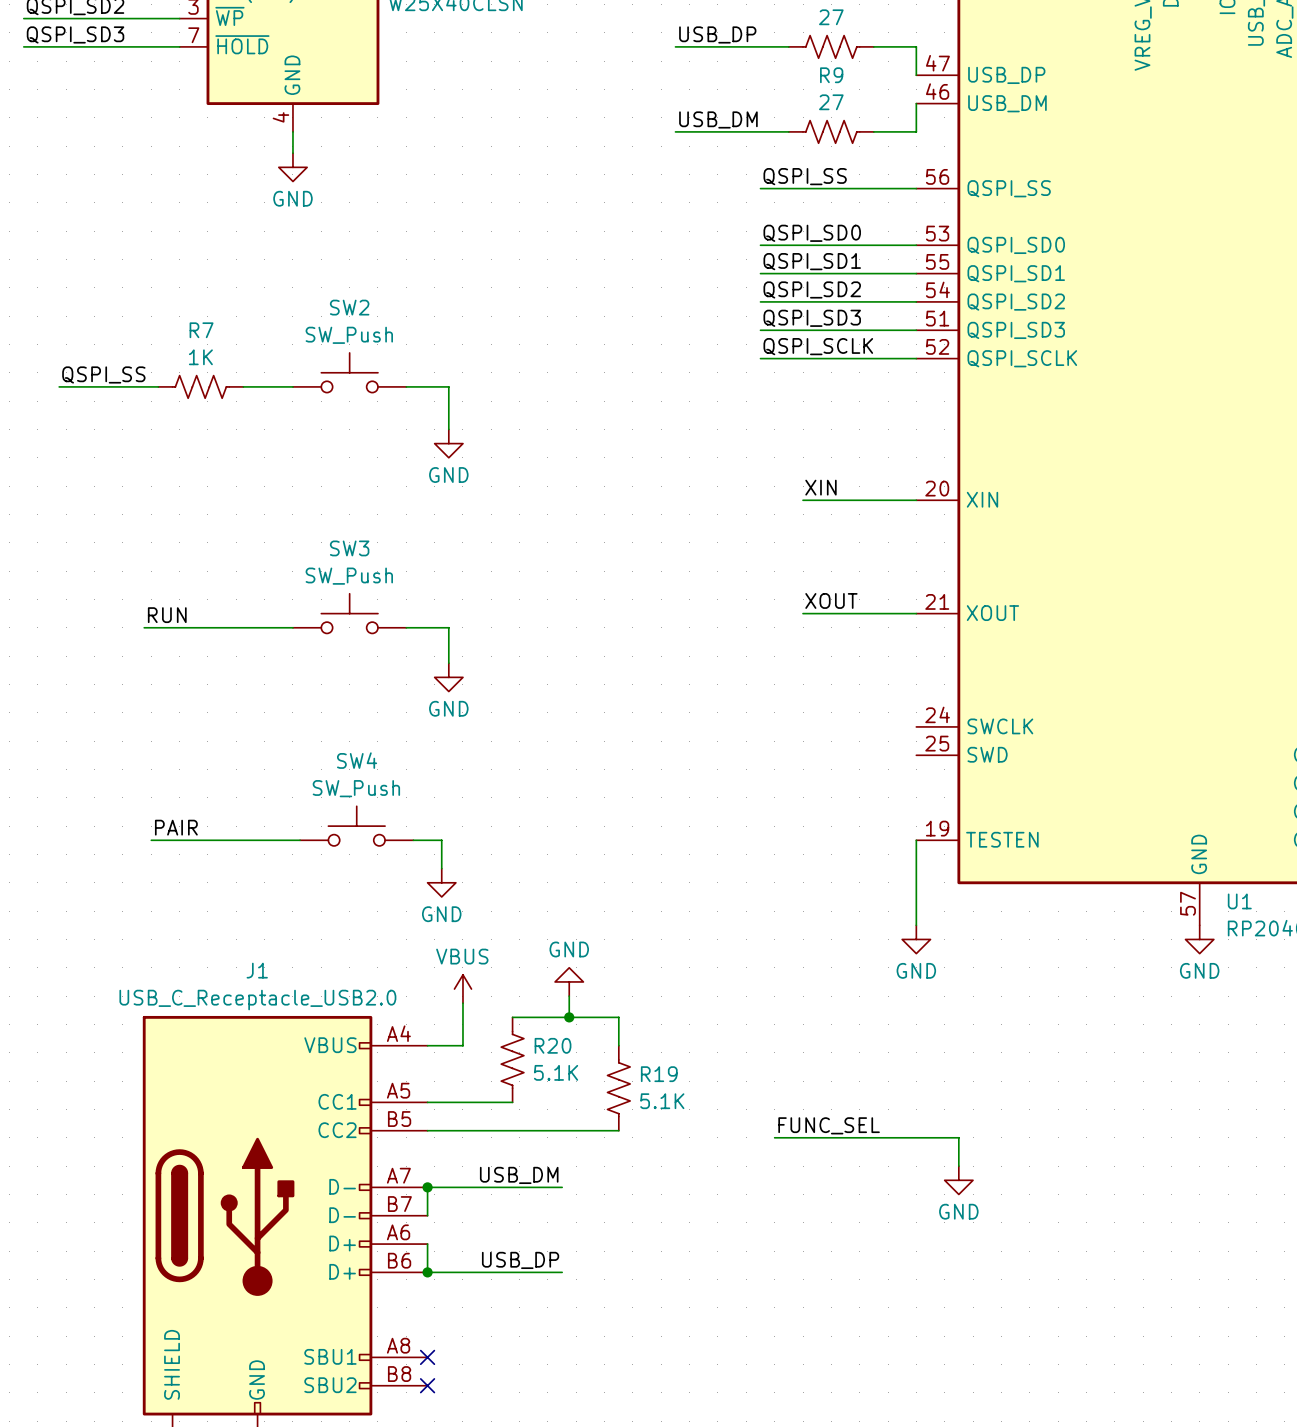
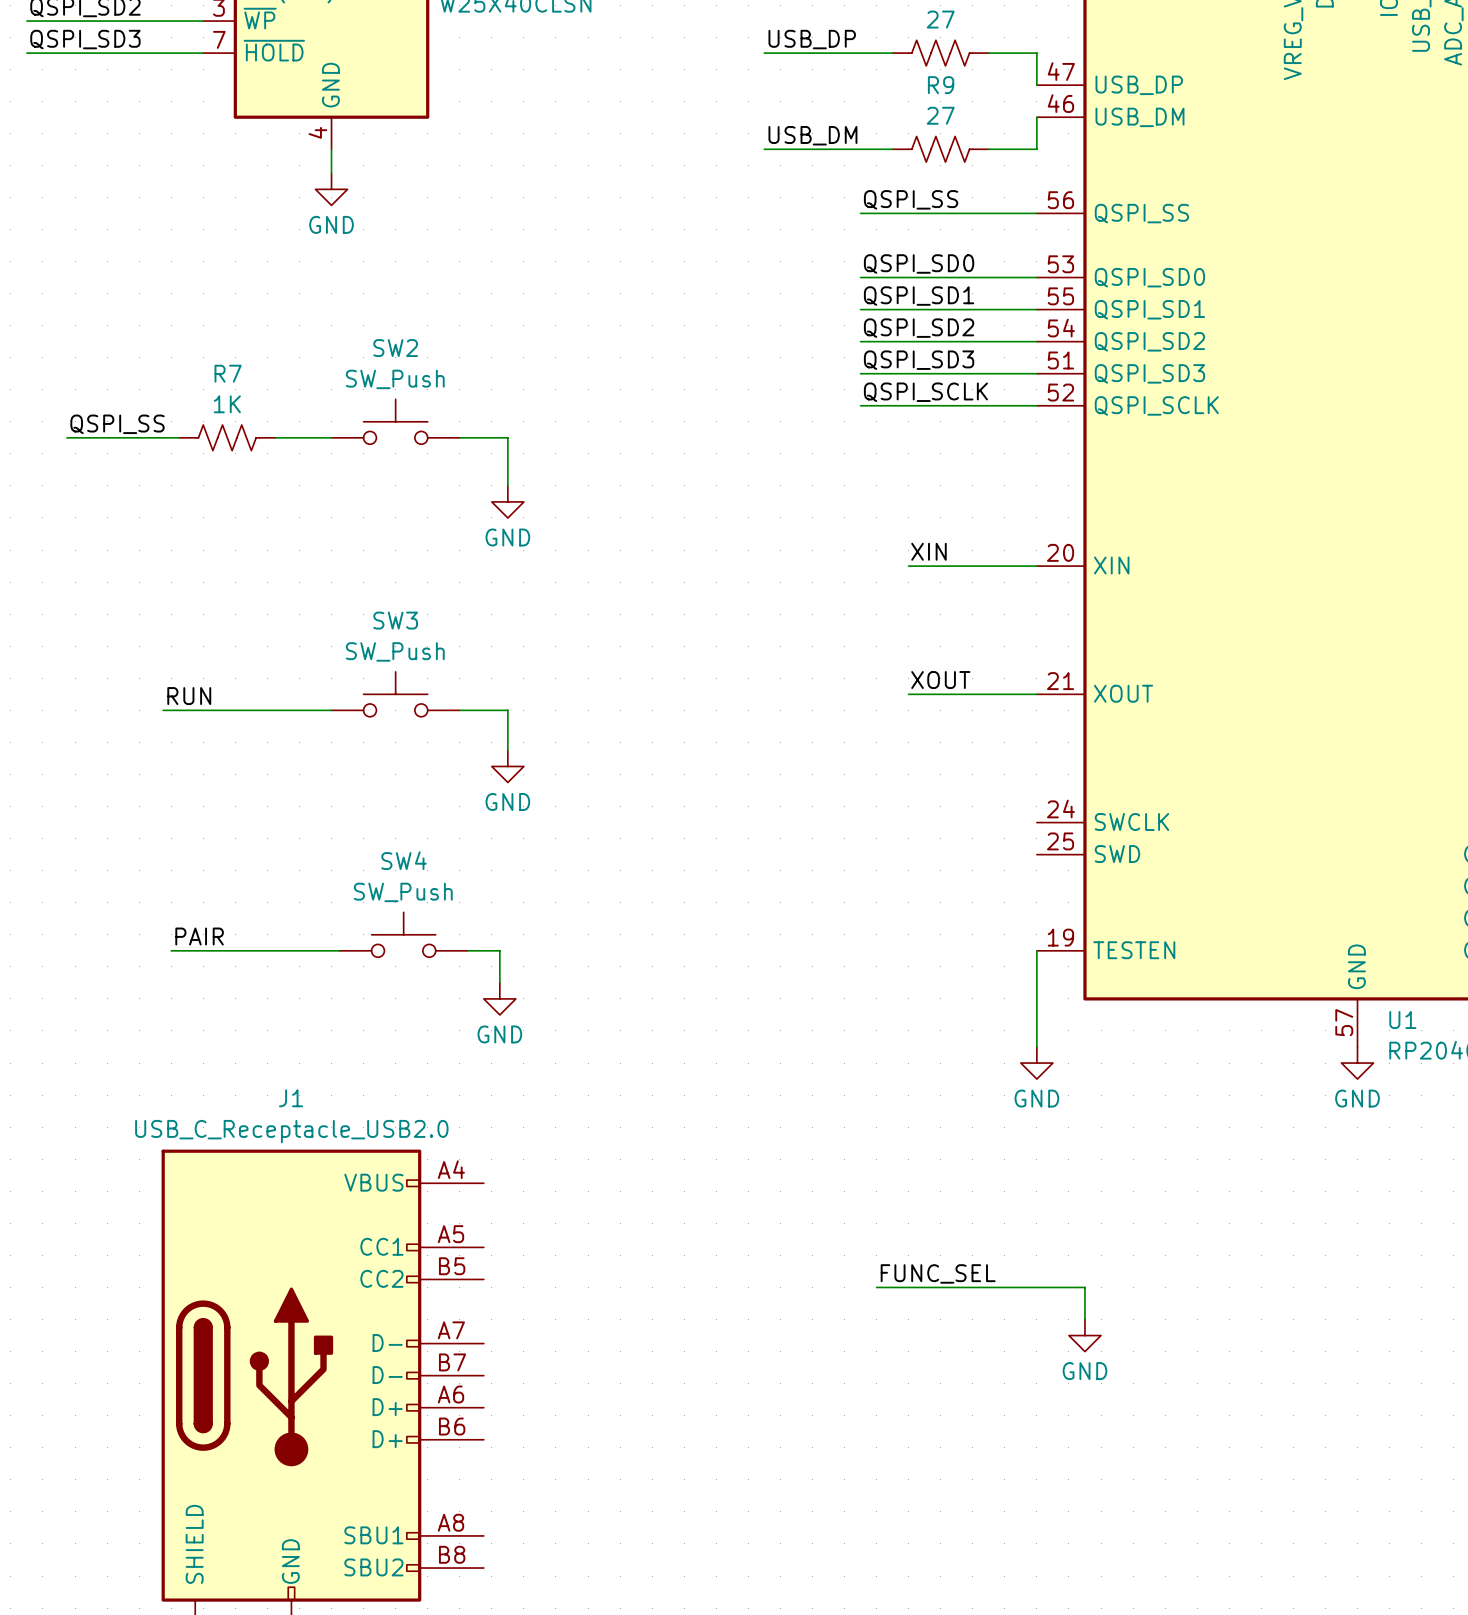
power symbol: GND (569, 981) -> none
power symbol: VBUS (462, 989) -> none
wire: (569, 996) (569, 1017) -> none
wire: (462, 1003) (462, 1045) (427, 1045) -> none
wire: (512, 1017) (618, 1017) (618, 1045) -> none
junction: (569, 1017) -> none
R20: 5.1K (512, 1059) -> none
R19: 5.1K (618, 1088) -> none
wire: (427, 1102) (512, 1102) -> none
wire: (427, 1130) (618, 1130) -> none
label: USB_DM (519, 1175) -> none
junction: (427, 1187) -> none
wire: (562, 1187) (427, 1187) (427, 1215) -> none
wire: (427, 1244) (427, 1272) (562, 1272) -> none
label: USB_DP (520, 1260) -> none
junction: (427, 1272) -> none
no-connect mark: (427, 1357) -> none
no-connect mark: (427, 1385) -> none

